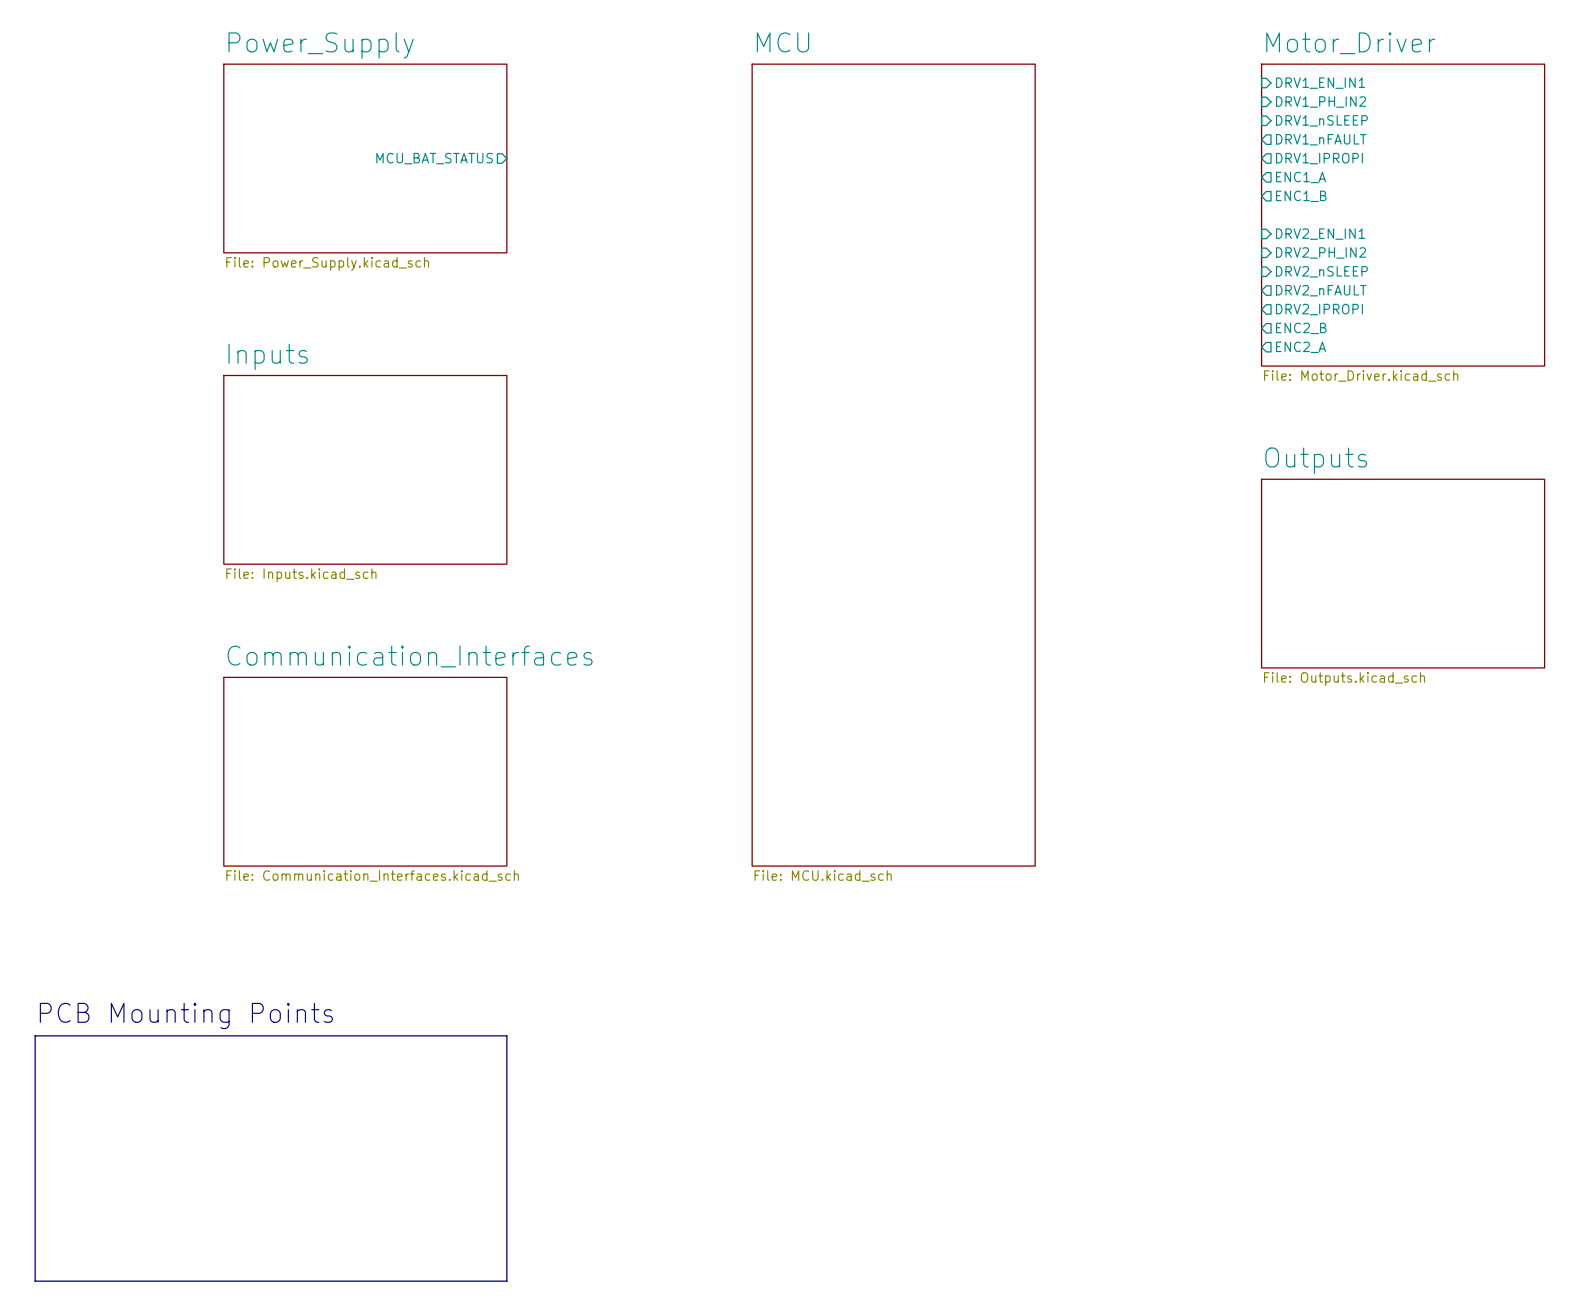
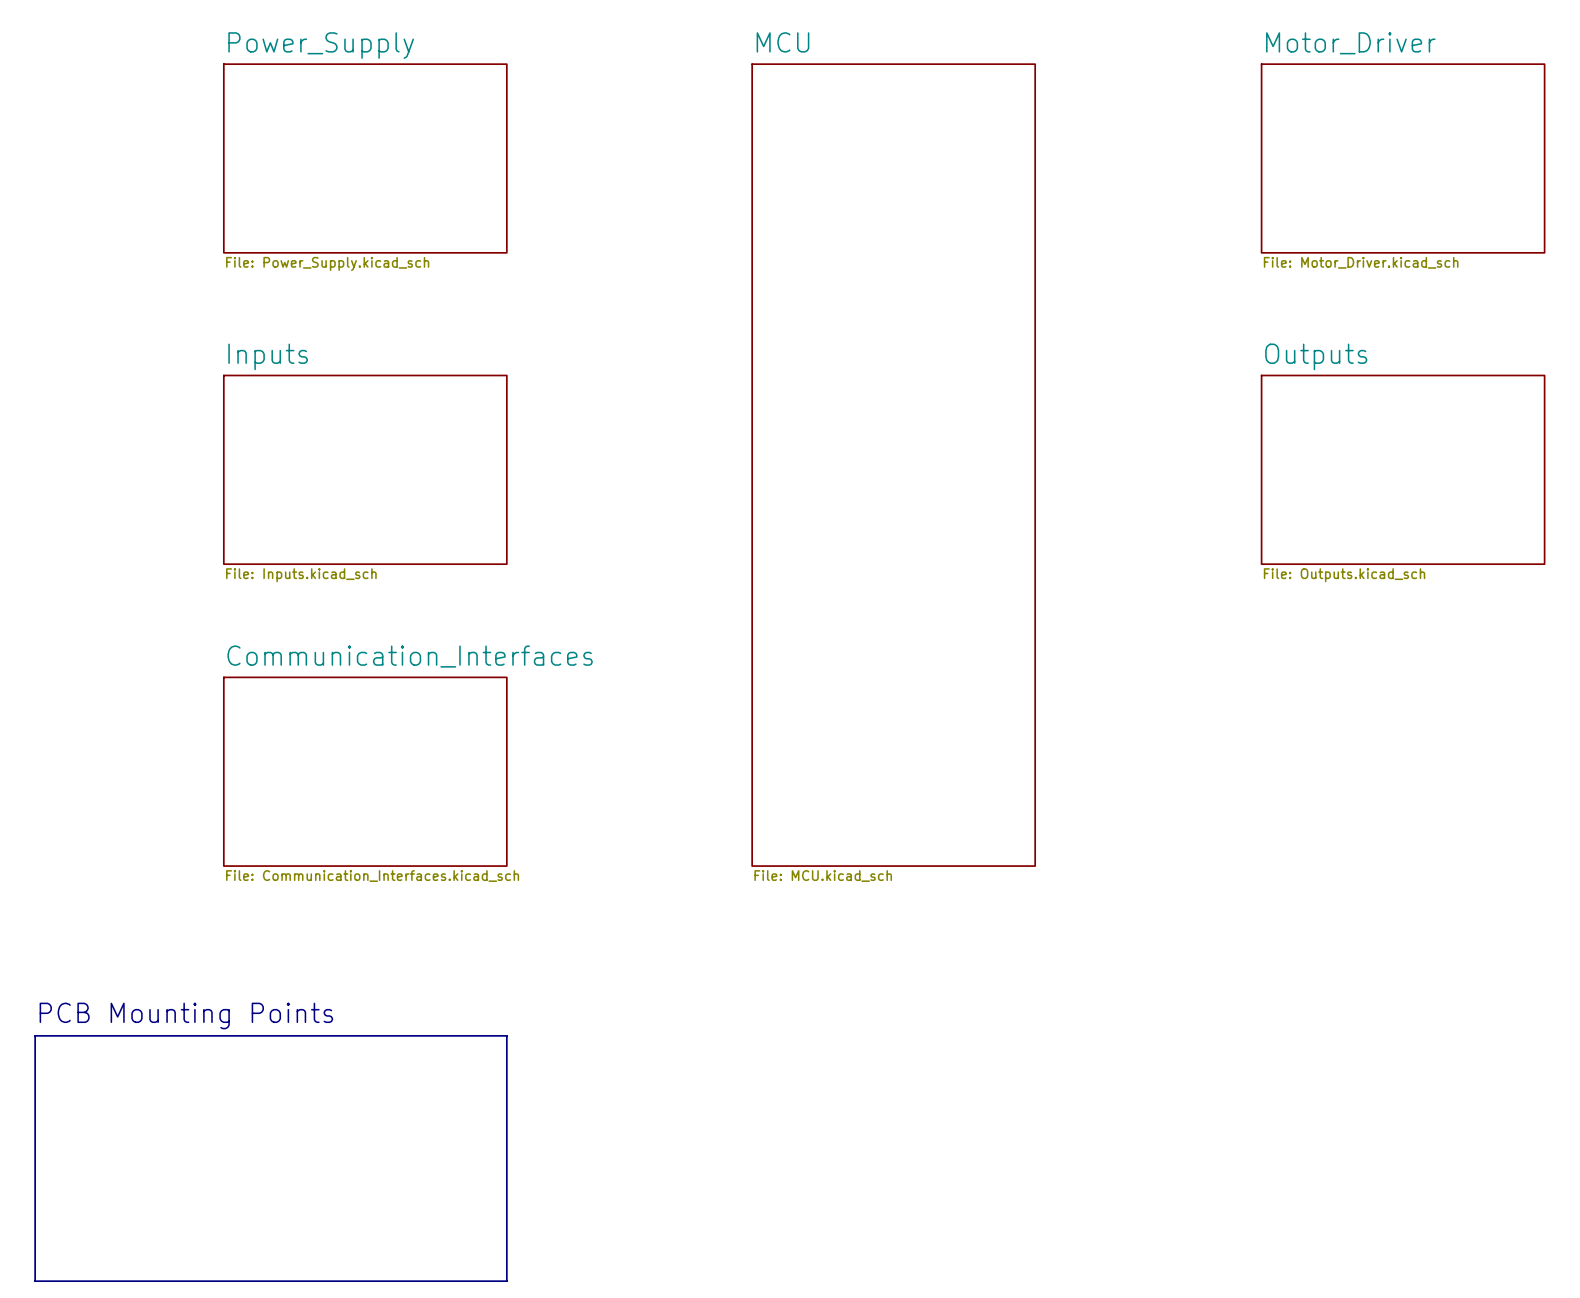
sheet pin: DRV1_EN_IN1 (1320, 83) -> none
sheet pin: DRV1_PH_IN2 (1321, 101) -> none
sheet pin: DRV1_nSLEEP (1321, 120) -> none
sheet pin: DRV1_nFAULT (1321, 139) -> none
sheet pin: MCU_BAT_STATUS (434, 158) -> none
sheet pin: DRV1_IPROPI (1319, 158) -> none
sheet Motor_Driver: none -> File: Motor_Driver.kicad_sch (1403, 158)
sheet pin: ENC1_A (1301, 177) -> none
sheet pin: ENC1_B (1301, 196) -> none
sheet Motor_Driver: File: Motor_Driver.kicad_sch (1403, 215) -> none
sheet pin: DRV2_EN_IN1 (1320, 234) -> none
sheet pin: DRV2_PH_IN2 (1321, 252) -> none
sheet pin: DRV2_nSLEEP (1321, 271) -> none
sheet pin: DRV2_nFAULT (1321, 290) -> none
sheet pin: DRV2_IPROPI (1319, 309) -> none
sheet pin: ENC2_B (1301, 328) -> none
sheet pin: ENC2_A (1301, 347) -> none
sheet Outputs position: (1403, 573) -> (1403, 469)

